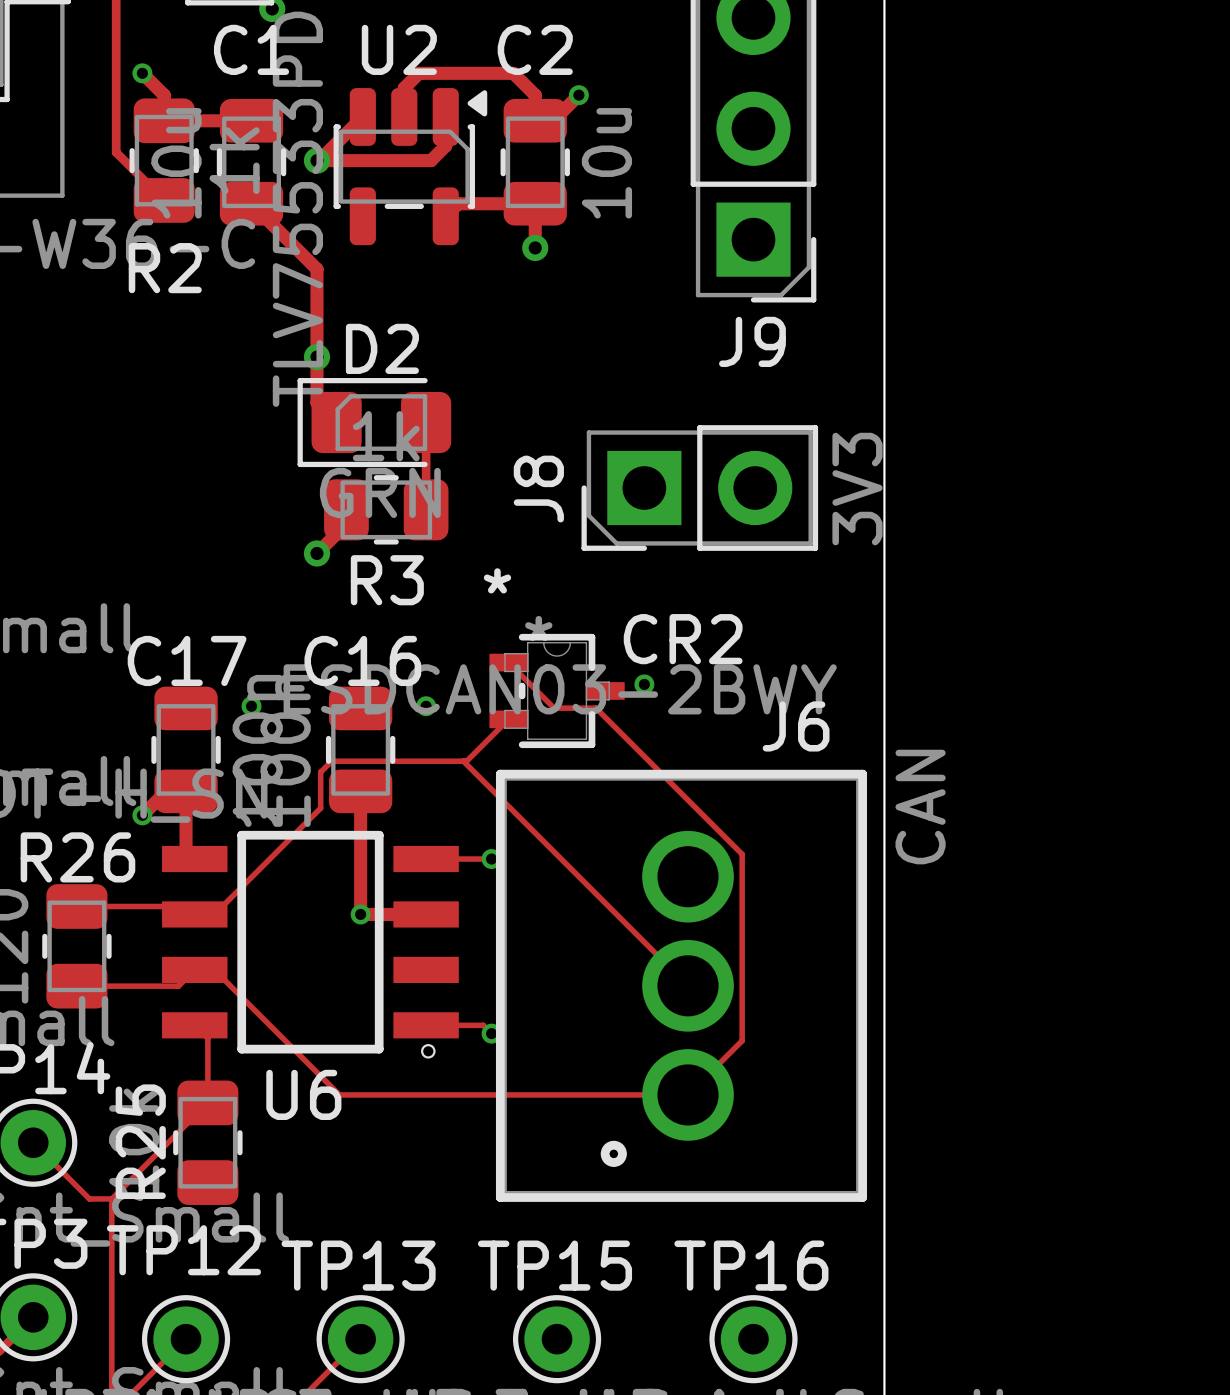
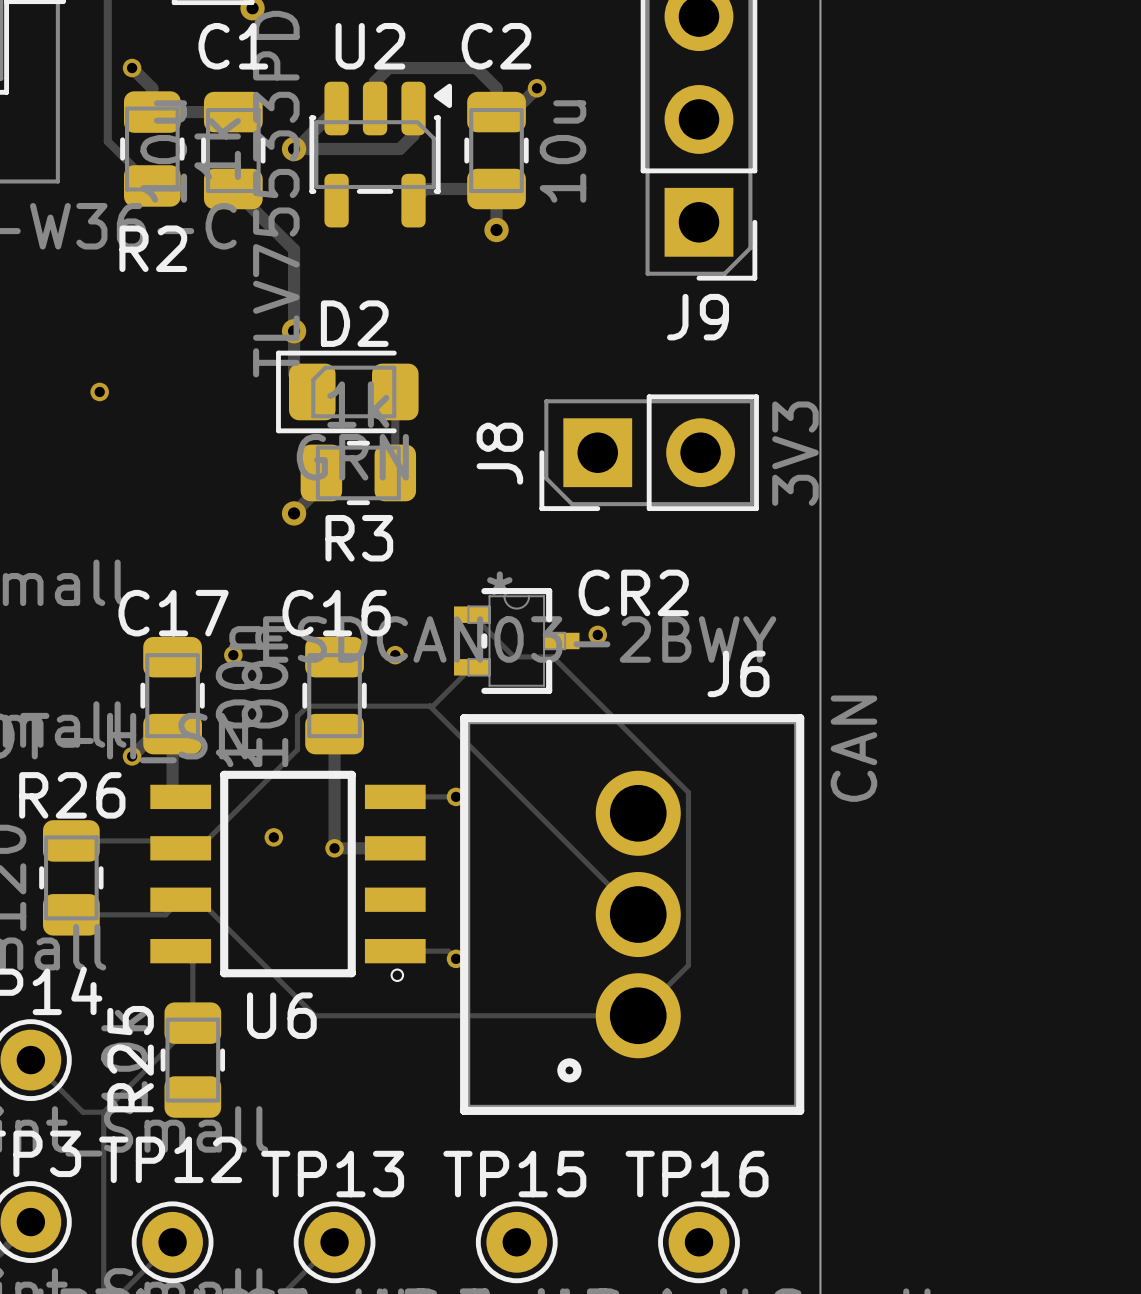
via: none -> (99, 391)
CR2 text: * (497, 580) -> none
via: none -> (273, 837)

